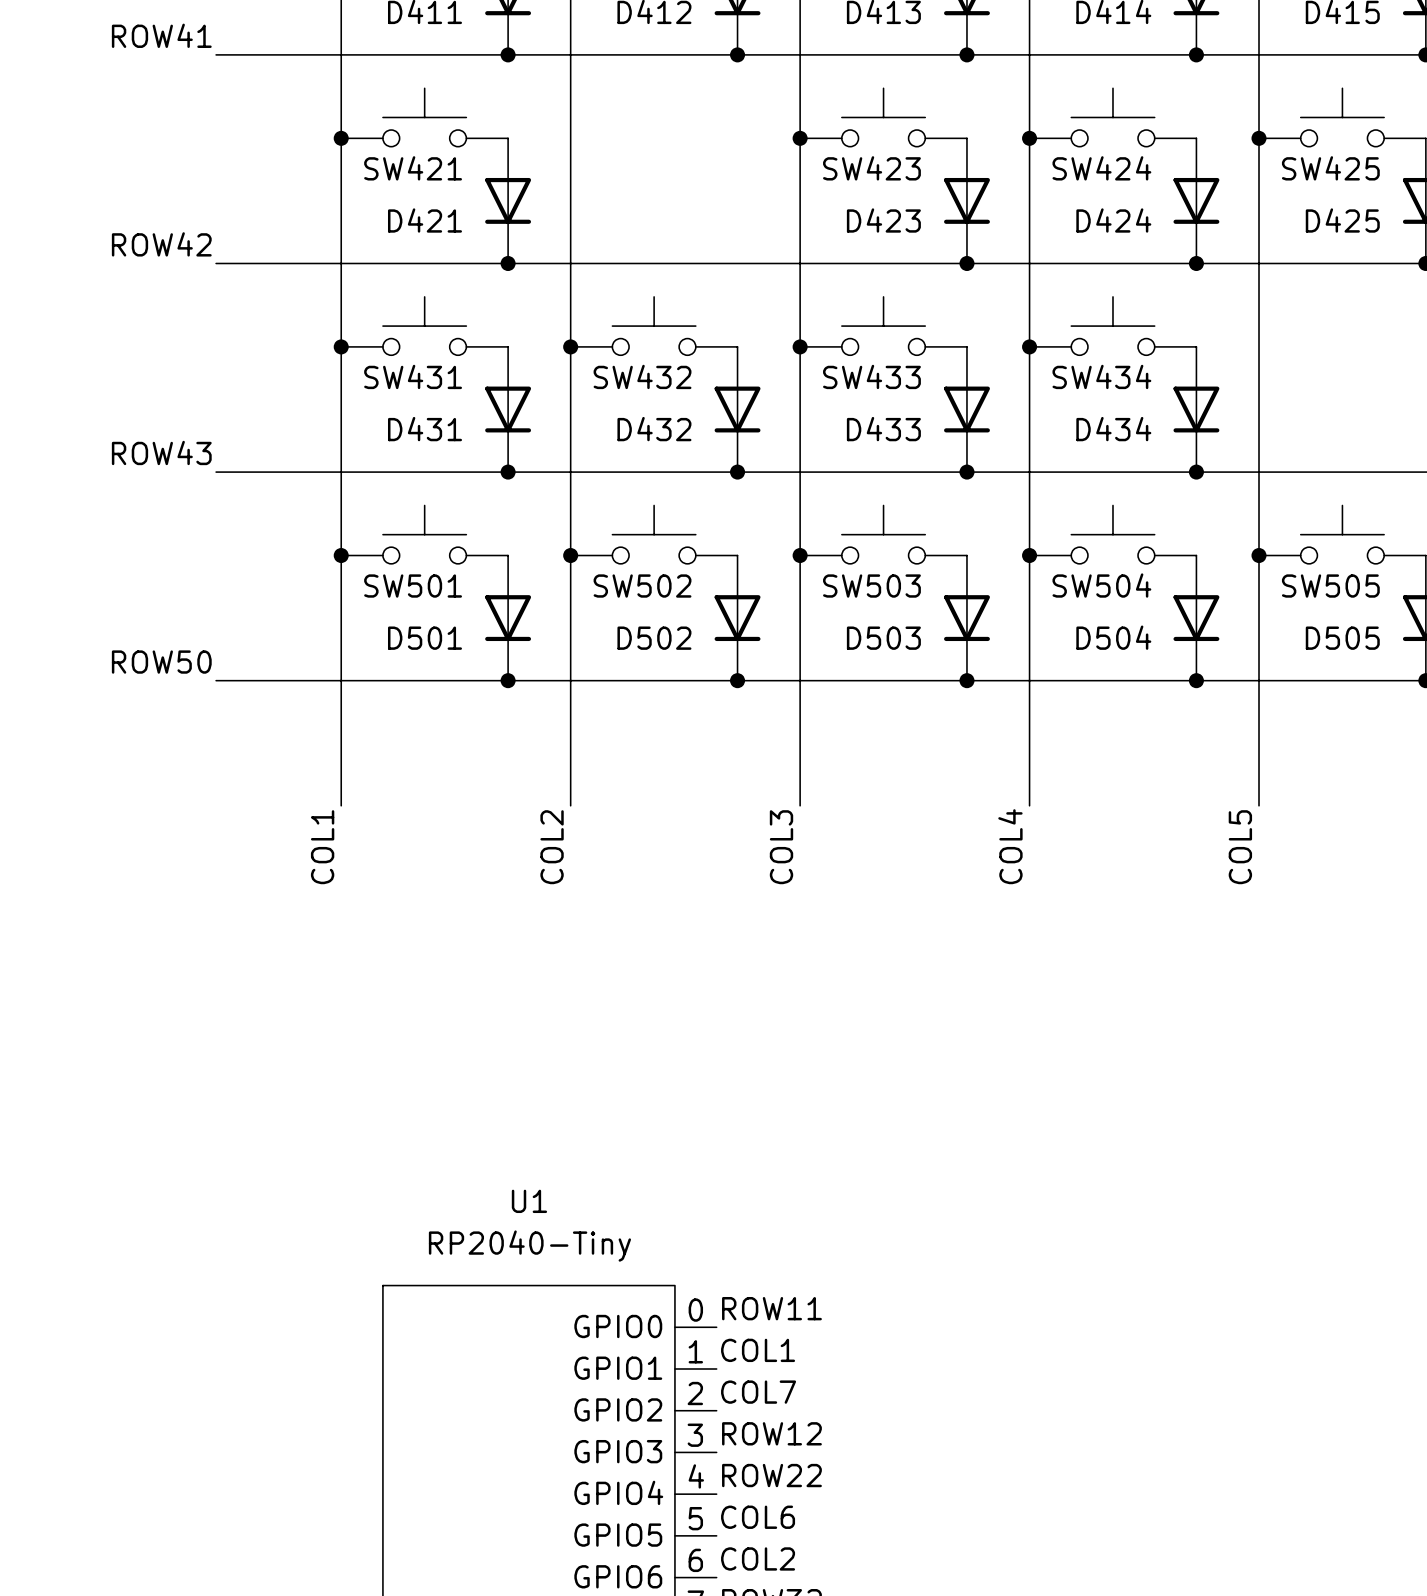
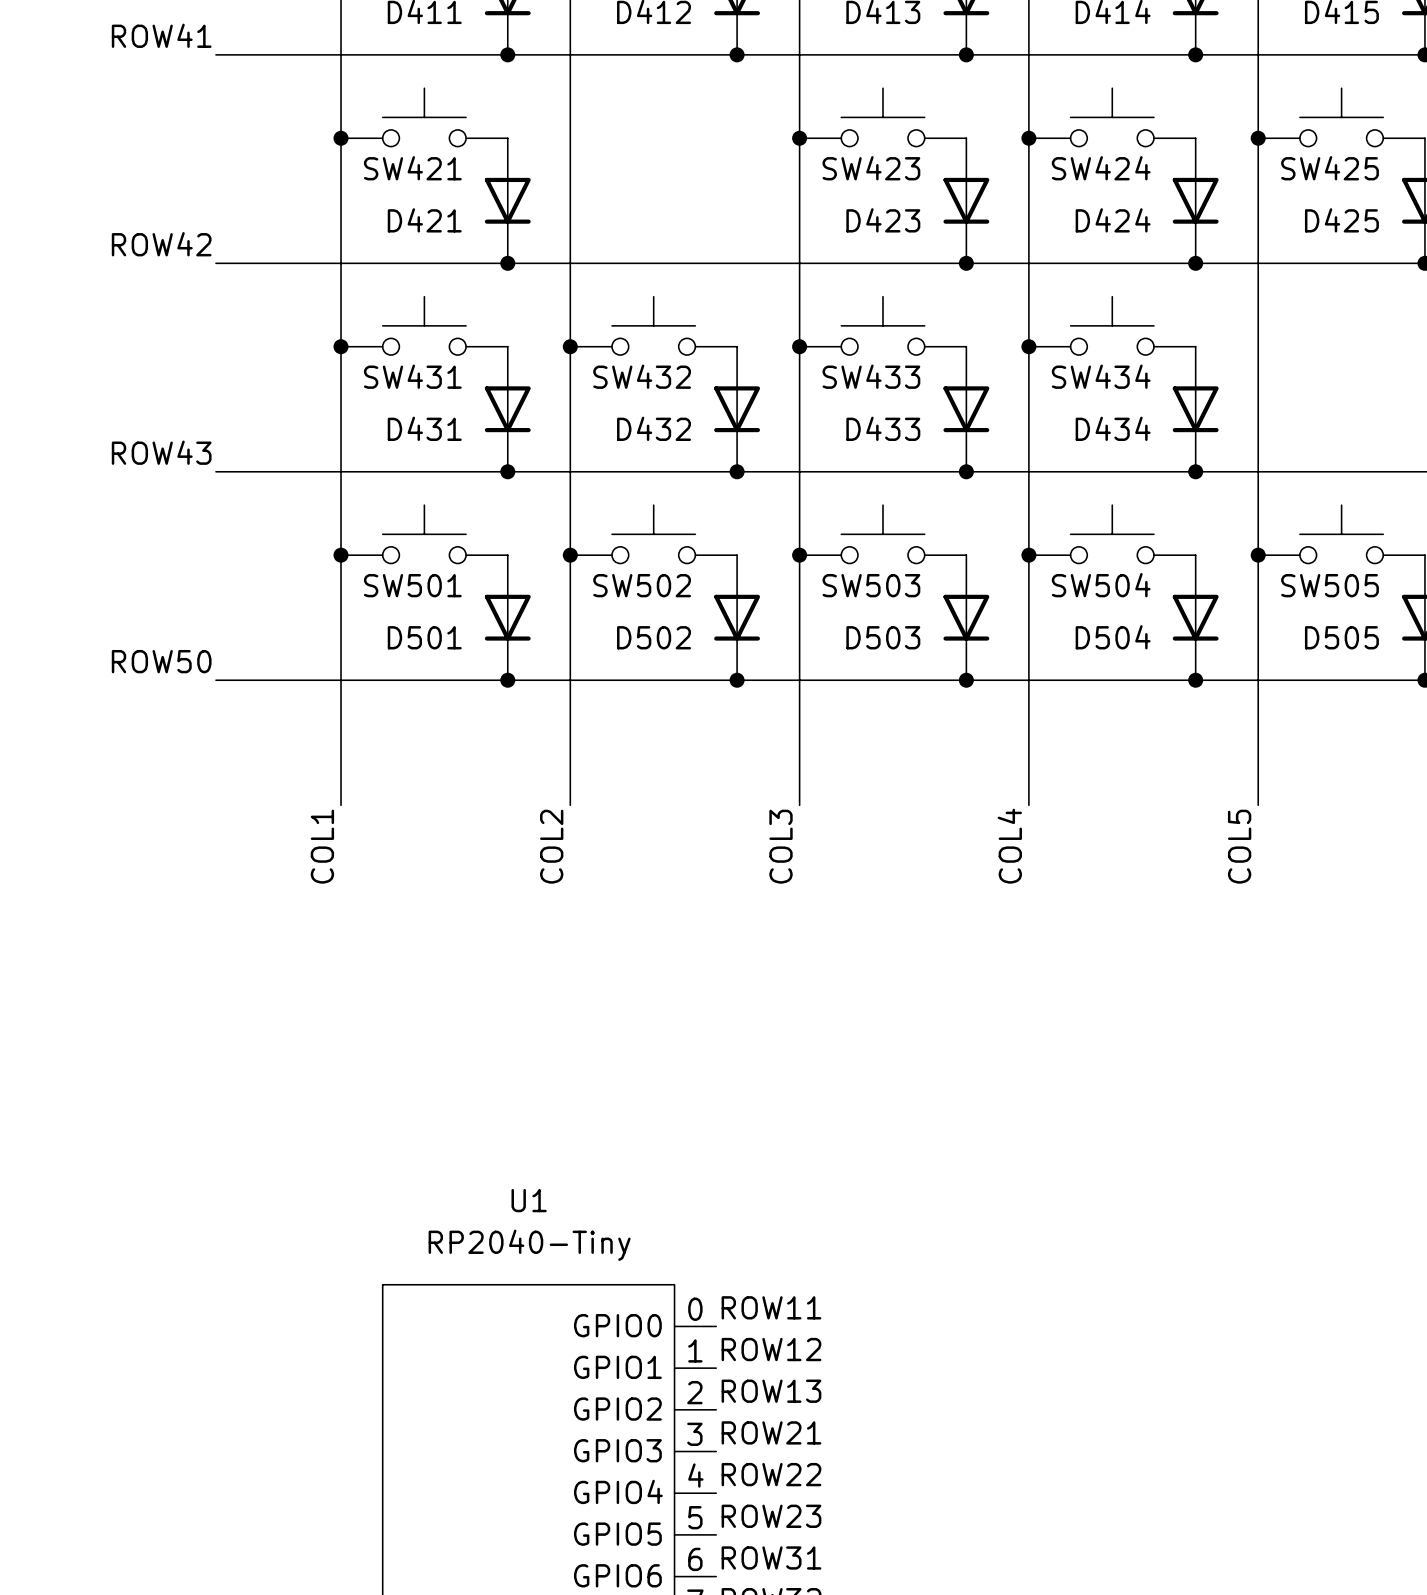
label: COL1 (758, 1350) -> ROW12 (771, 1349)
label: COL7 (758, 1392) -> ROW13 (771, 1391)
label: ROW12 (771, 1433) -> ROW21 (771, 1432)
label: COL6 (758, 1517) -> ROW23 (771, 1516)
label: COL2 (758, 1558) -> ROW31 (771, 1557)

